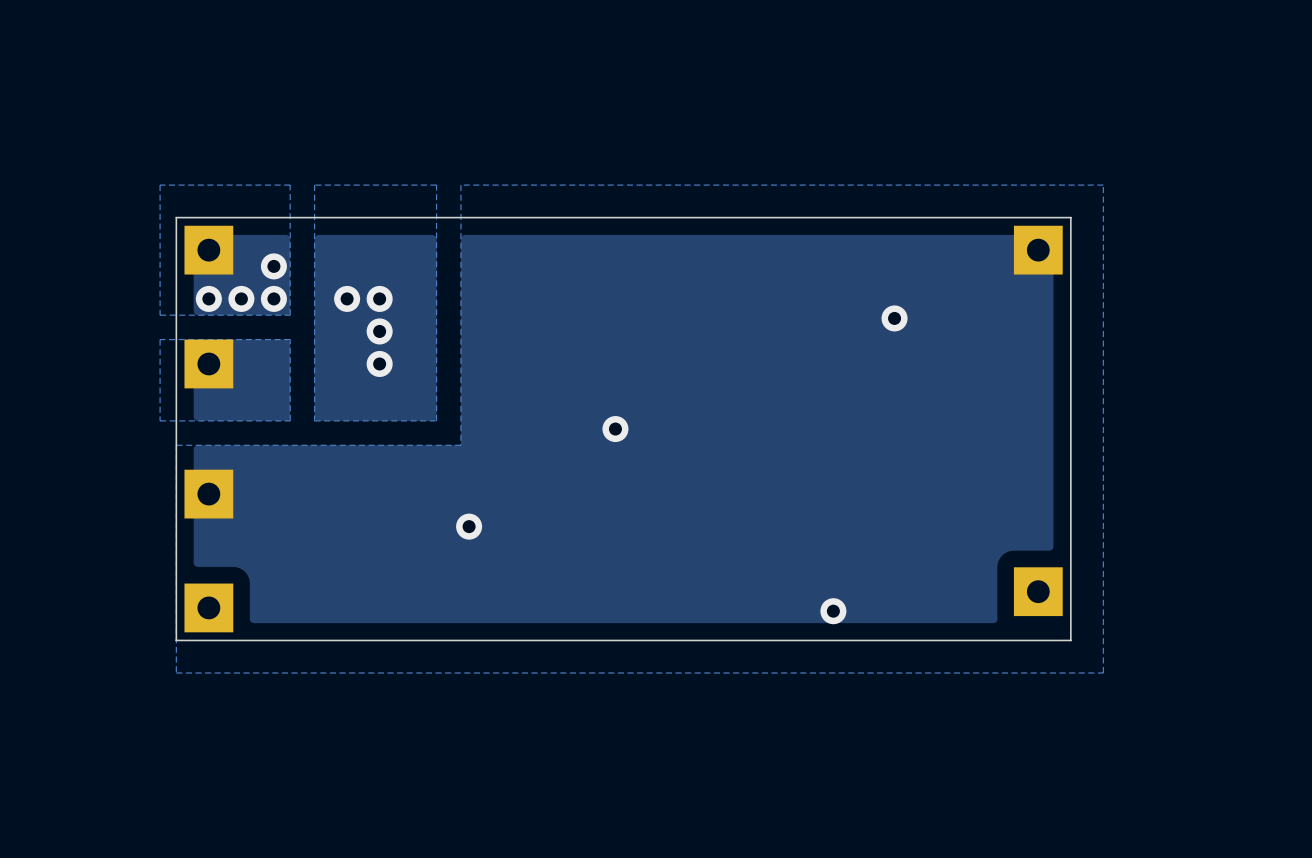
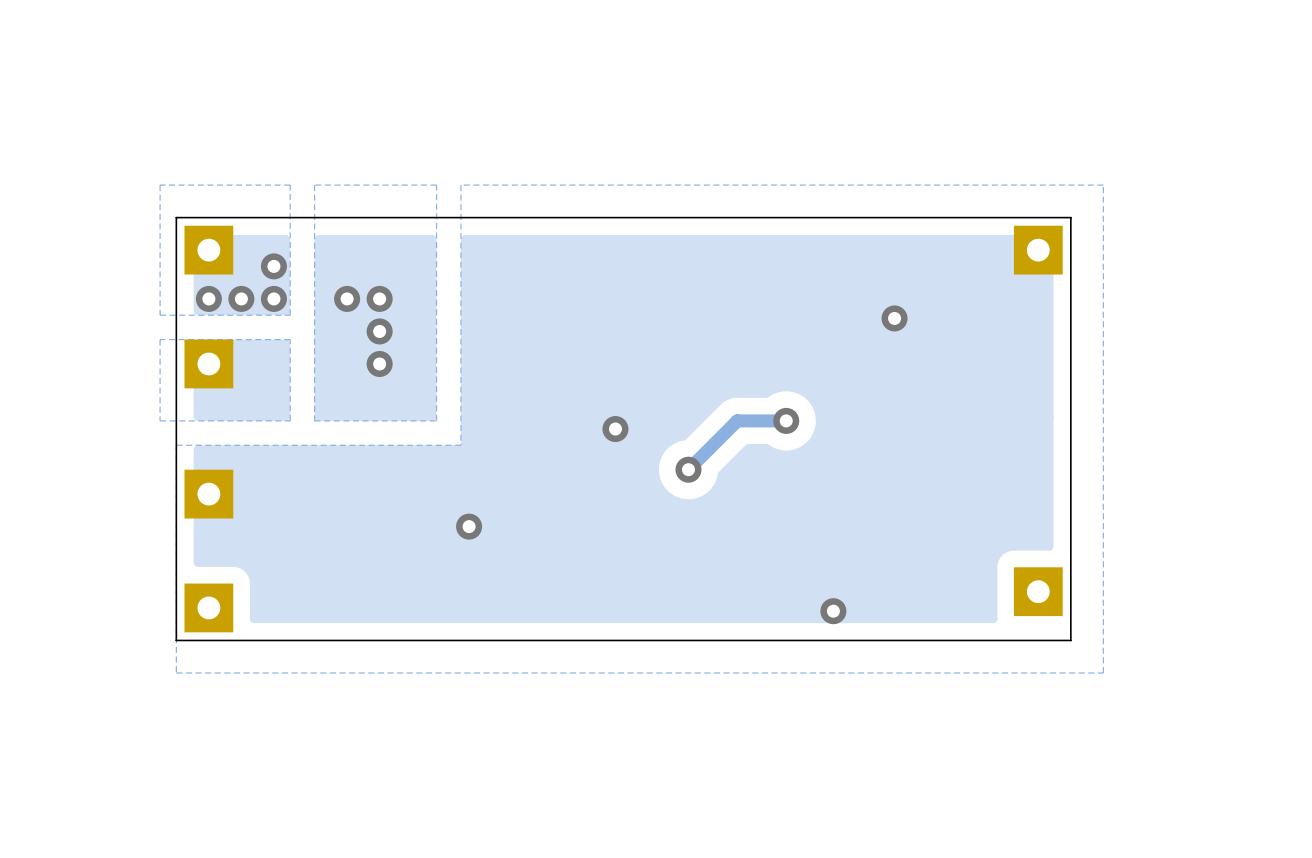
track: none -> (786, 420) (737, 420) (688, 469)
via: none -> (786, 420)
via: none -> (688, 469)

